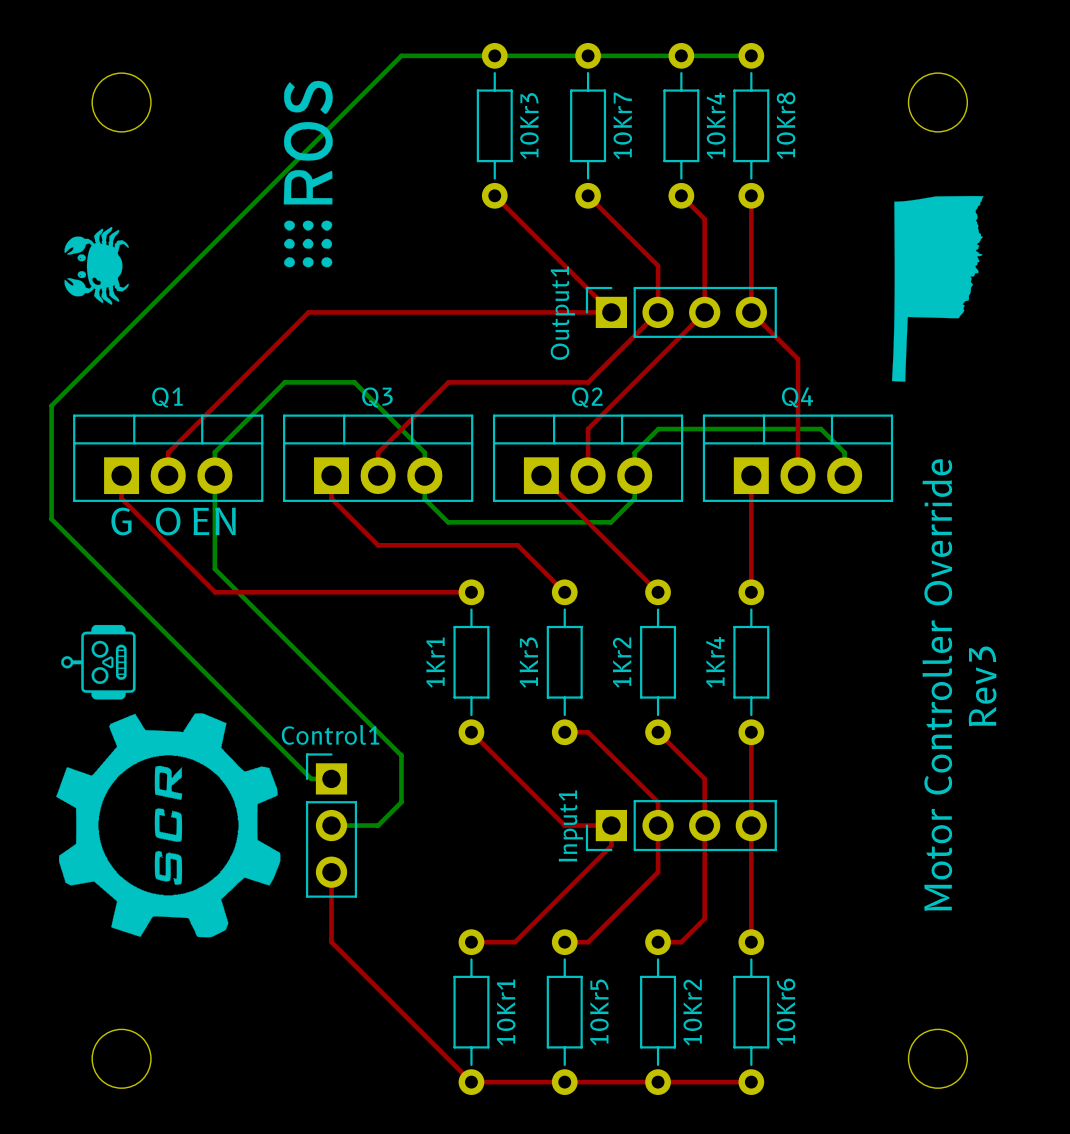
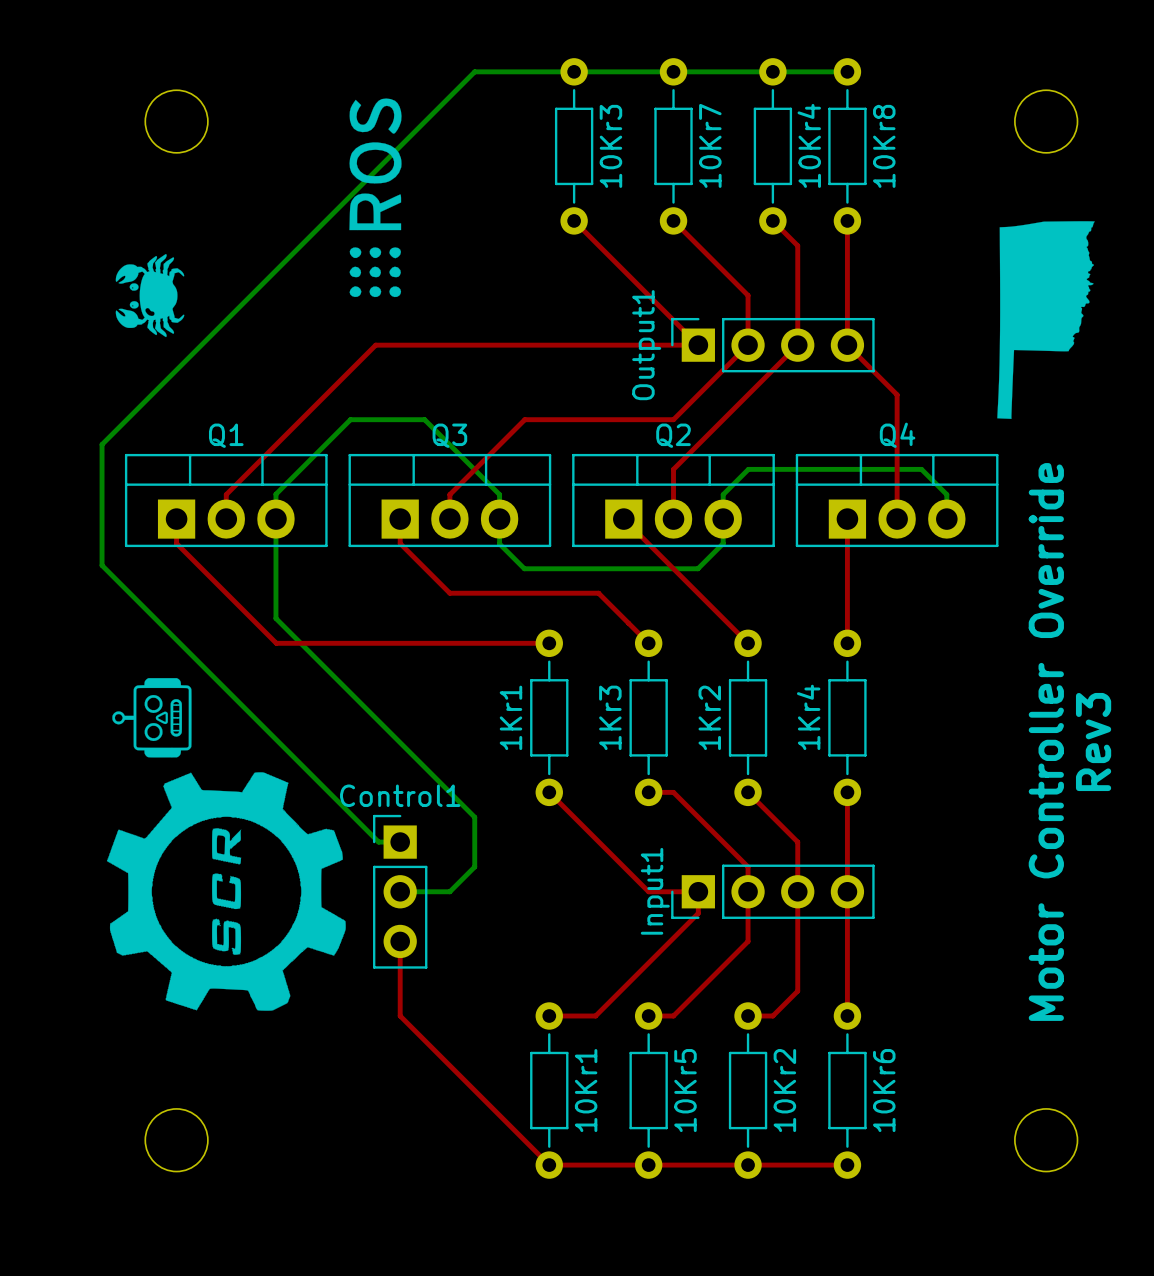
text: G (121, 521) -> none
text: O (168, 521) -> none
text: EN (214, 521) -> none

